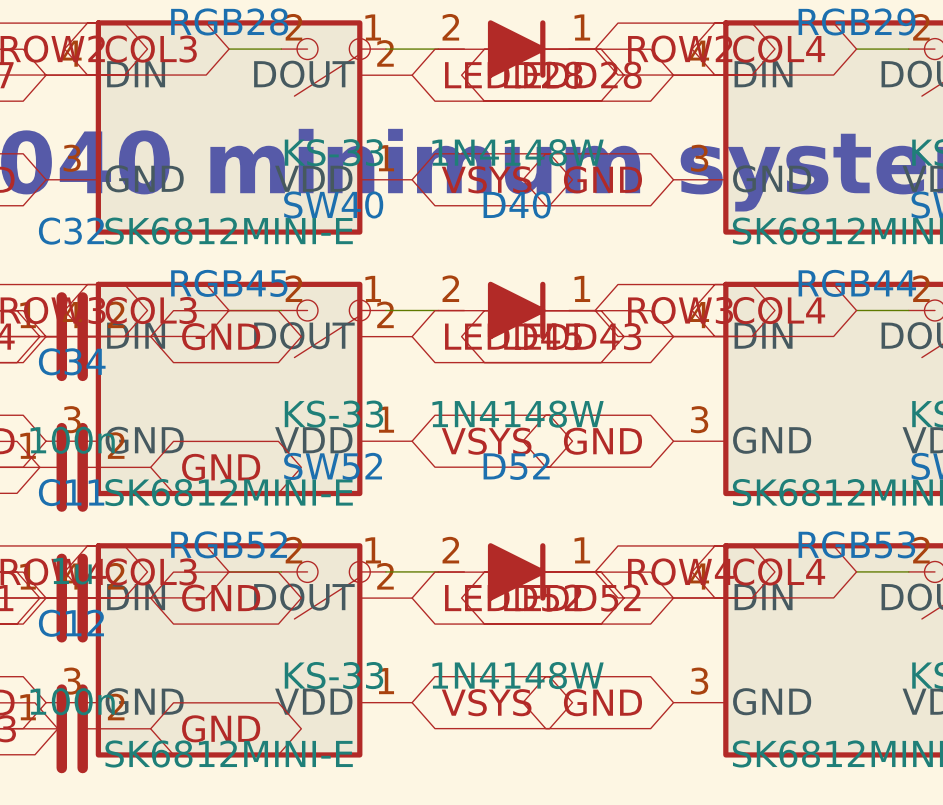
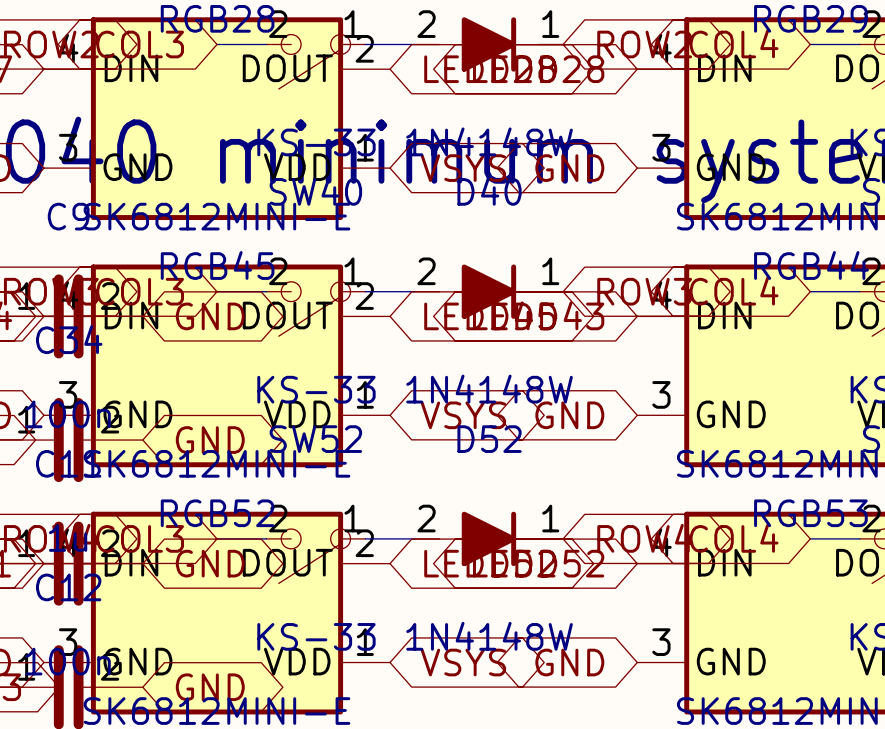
C32 name: C32 (71, 231) -> C9 (68, 216)

